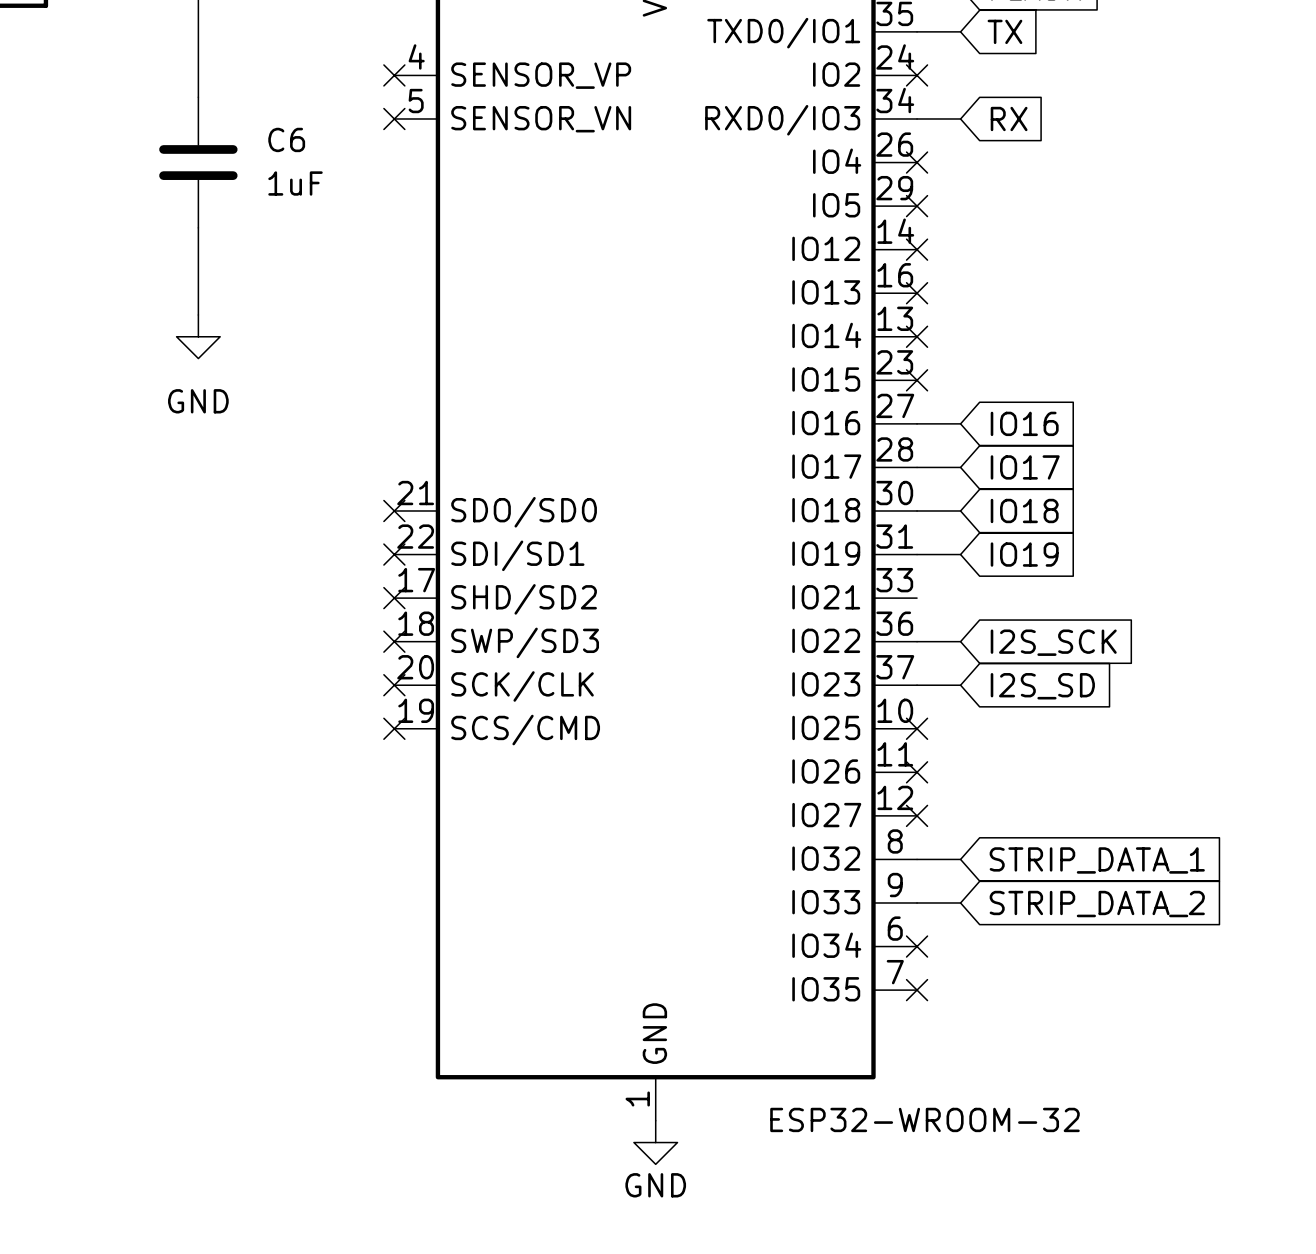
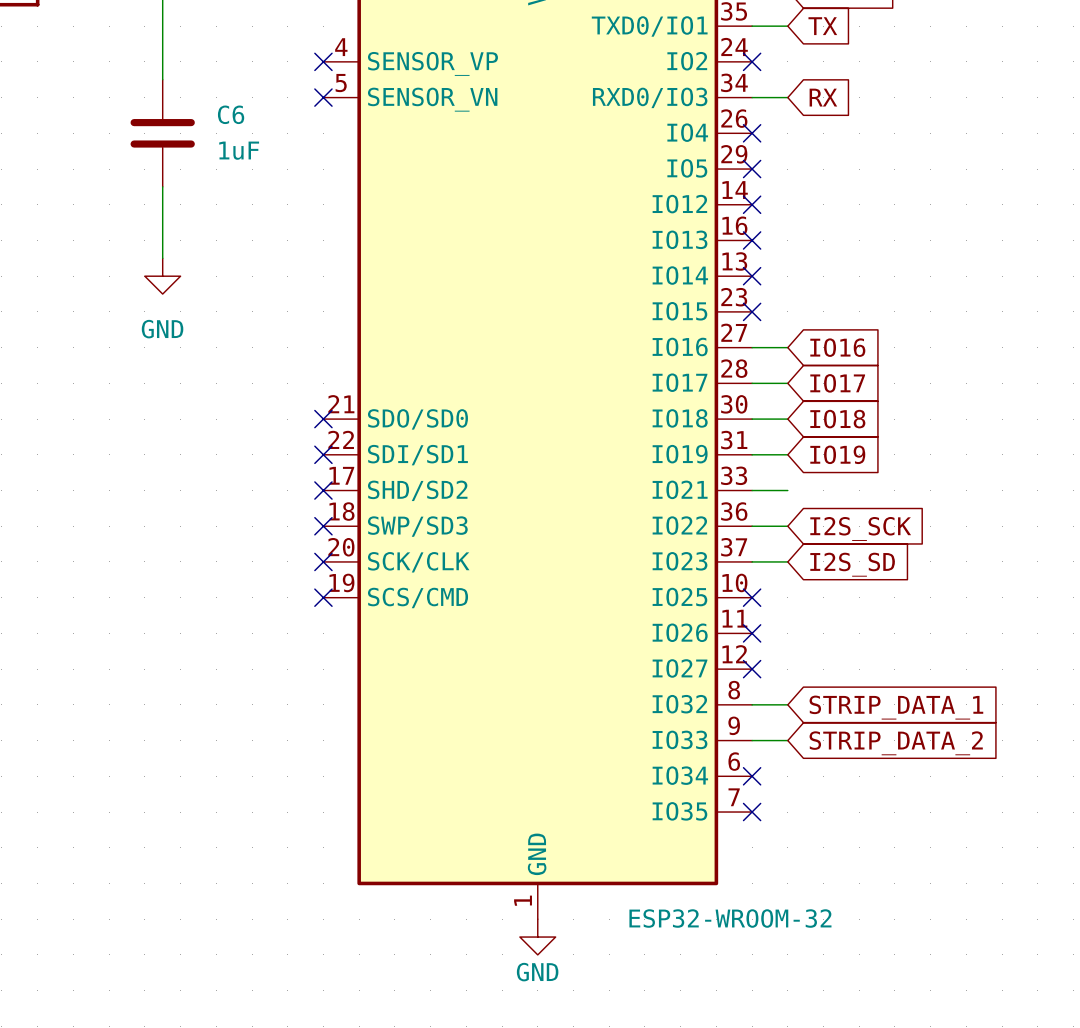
wire: none -> (752, 490) (787, 490)

